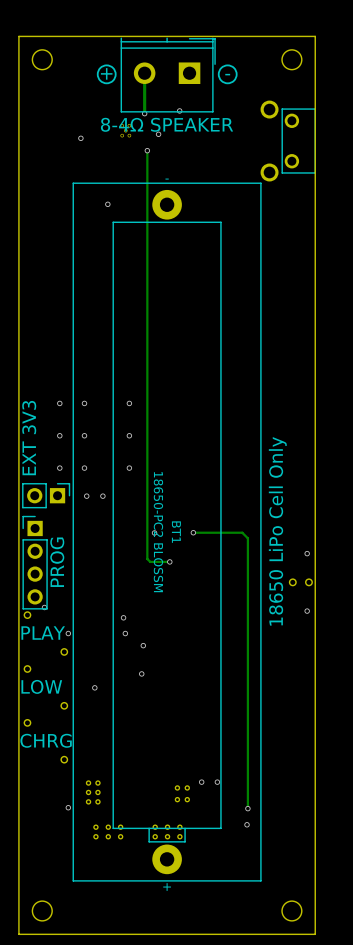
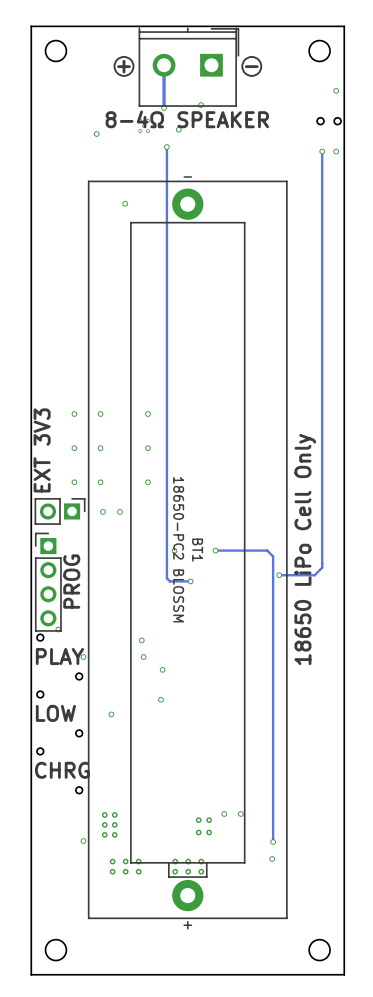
via: none -> (336, 90)
part: none -> (329, 121)
part: (288, 141) -> none
track: none -> (322, 151) (322, 567) (314, 575) (279, 575)
via: none -> (322, 151)
via: none -> (336, 151)
via: (307, 553) -> none
via: none -> (279, 575)
part: (300, 582) -> none
via: (307, 611) -> none

